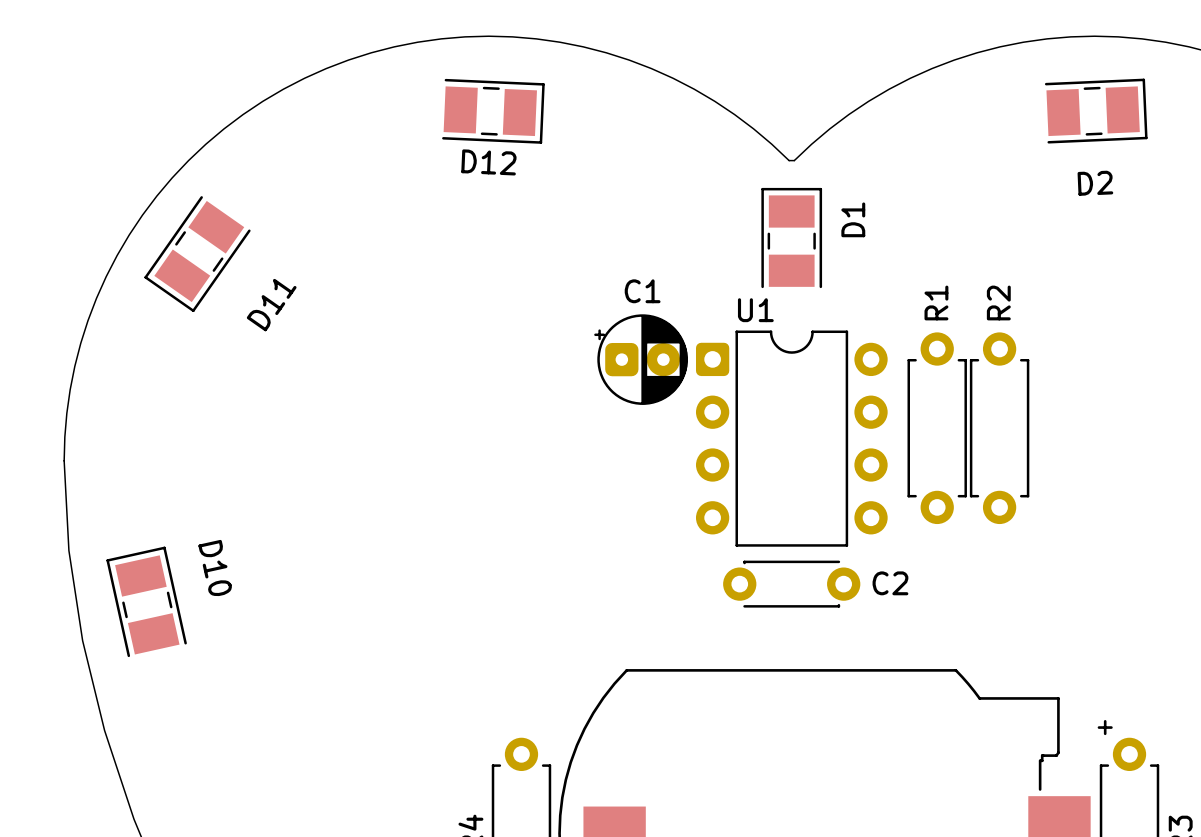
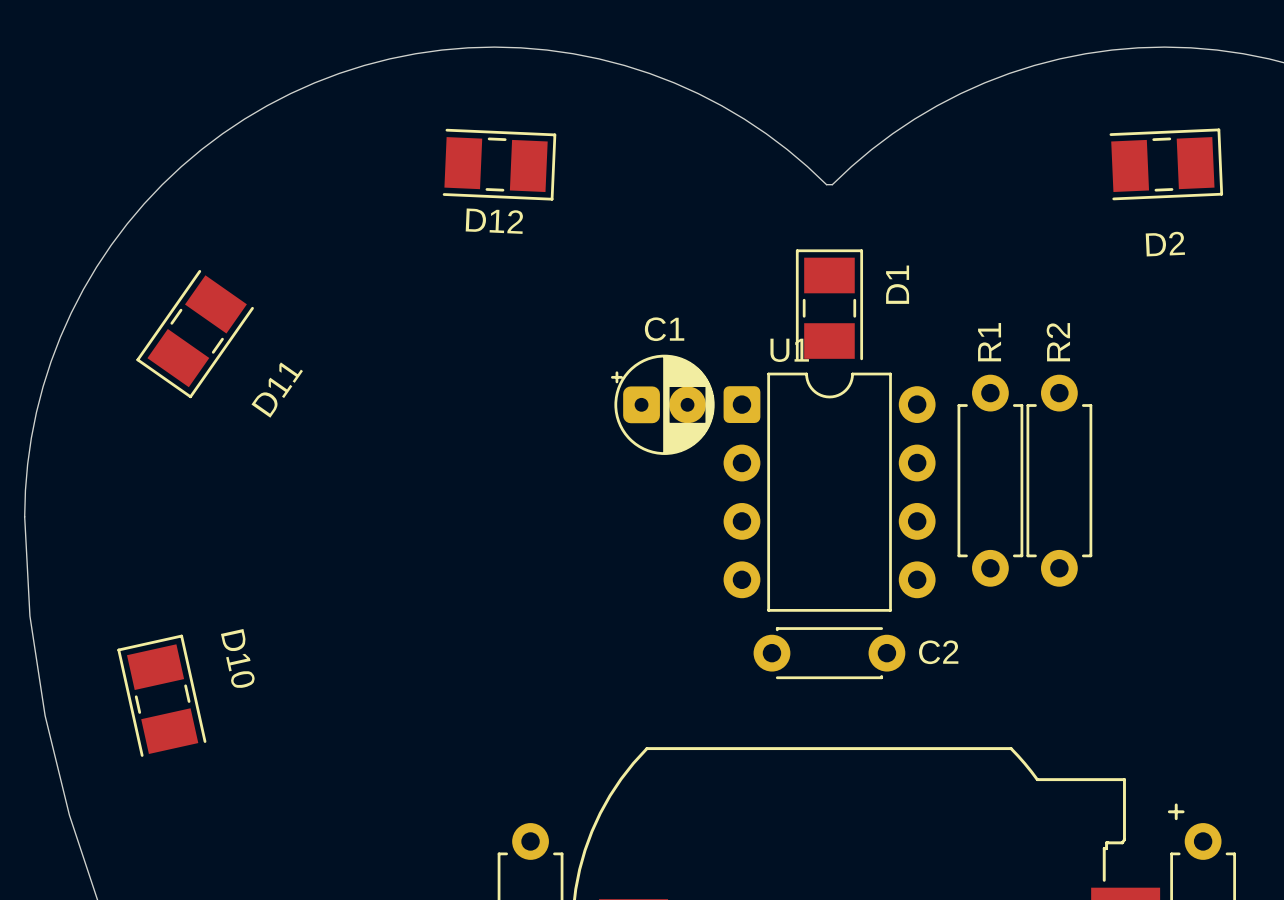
D12 position: (493, 111) -> (499, 164)
D2 position: (1096, 111) -> (1166, 164)
D1 position: (791, 238) -> (829, 304)
D11 position: (197, 254) -> (195, 334)
D10 position: (146, 601) -> (161, 695)

